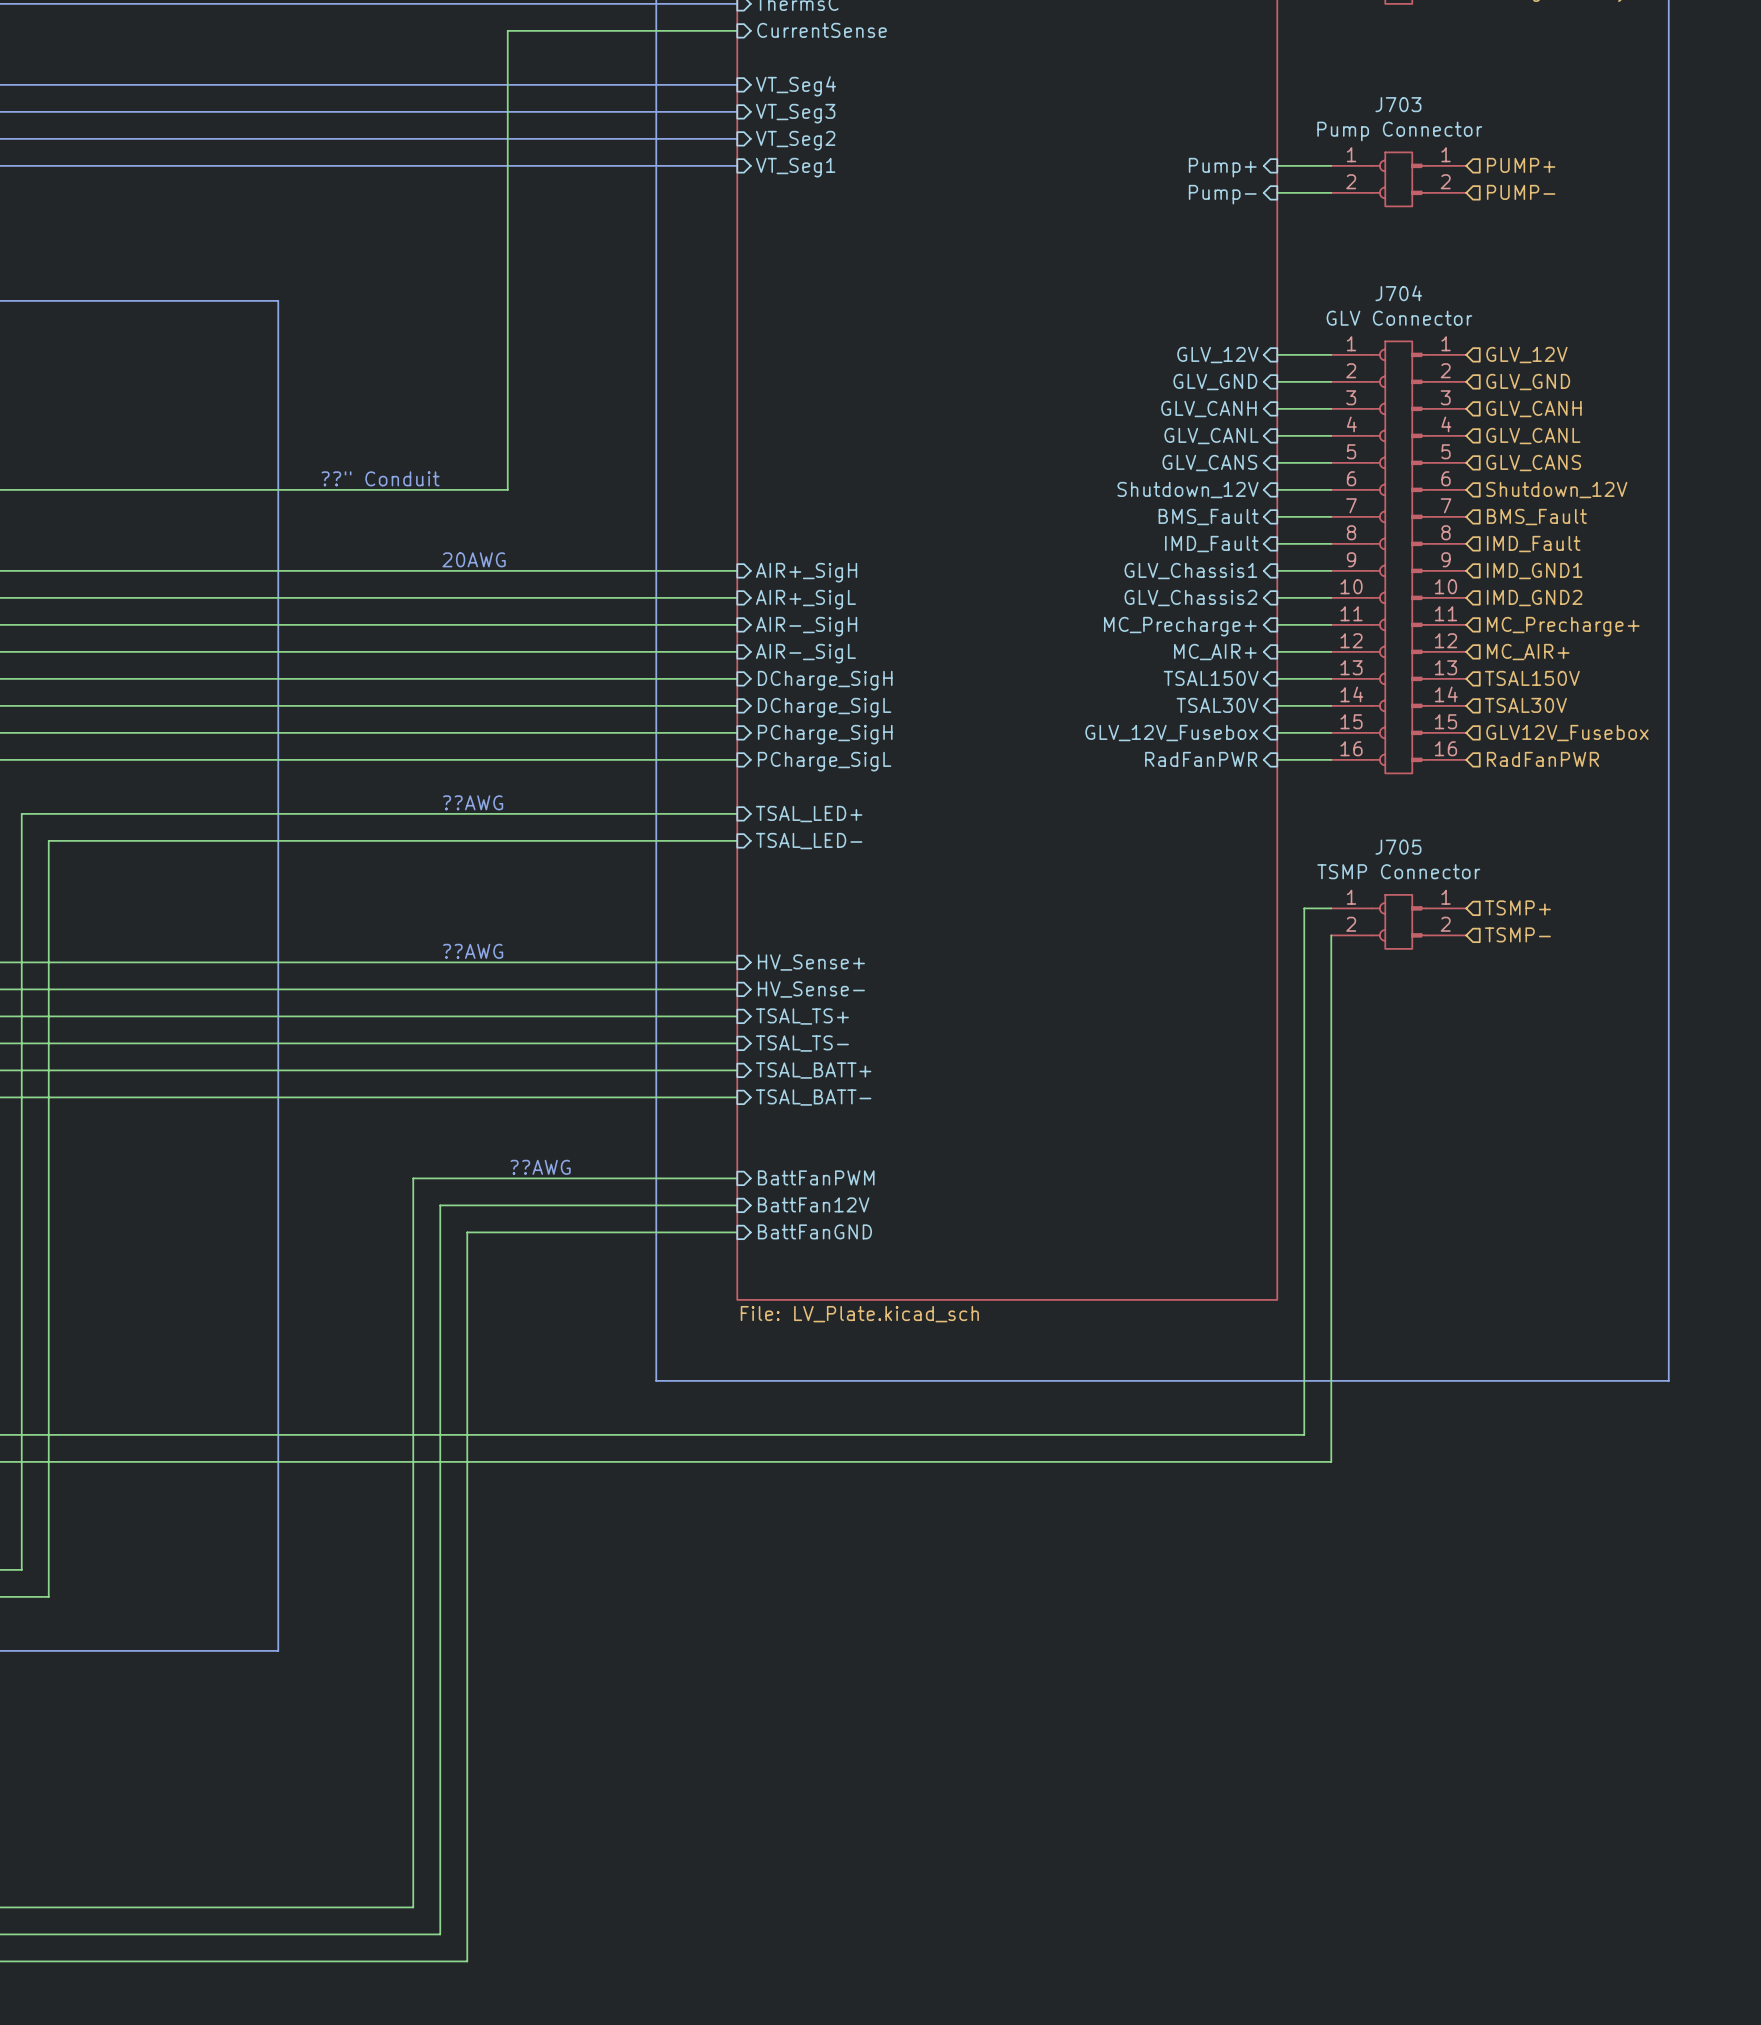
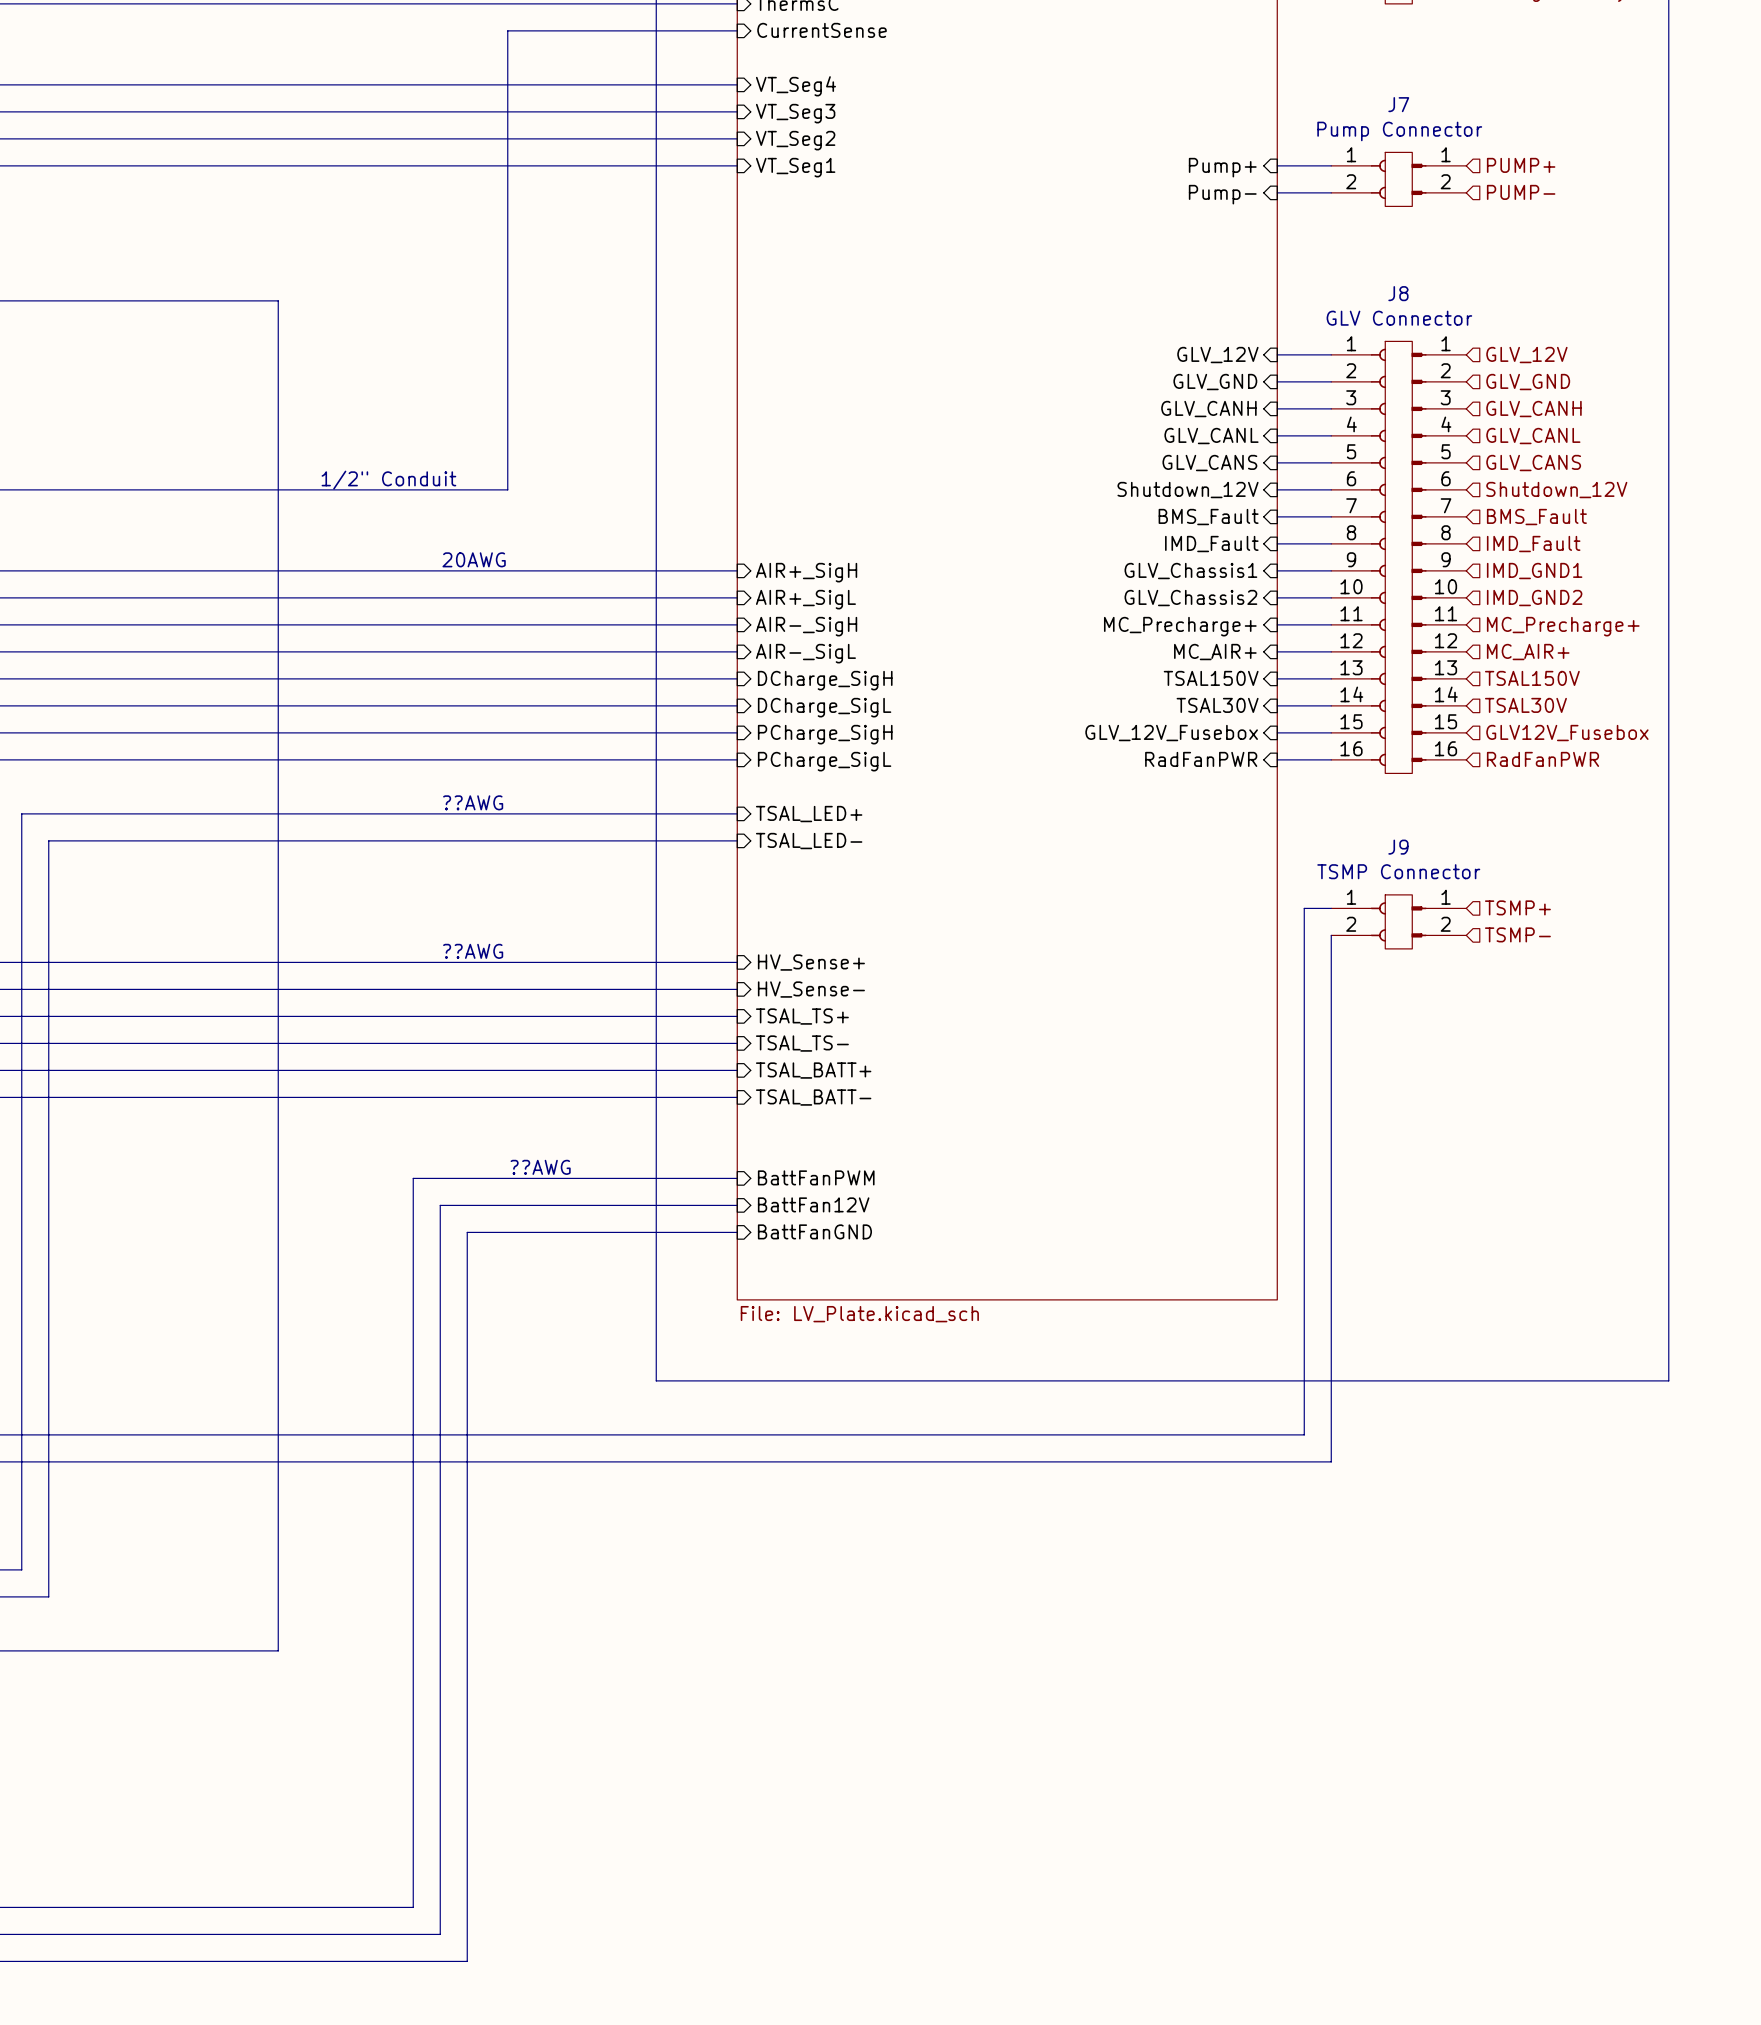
J703 name: J703 (1398, 104) -> J7 (1398, 104)
J704 name: J704 (1398, 293) -> J8 (1398, 293)
text: ??" Conduit (380, 478) -> 1/2" Conduit (388, 480)
J705 name: J705 (1398, 847) -> J9 (1398, 847)

